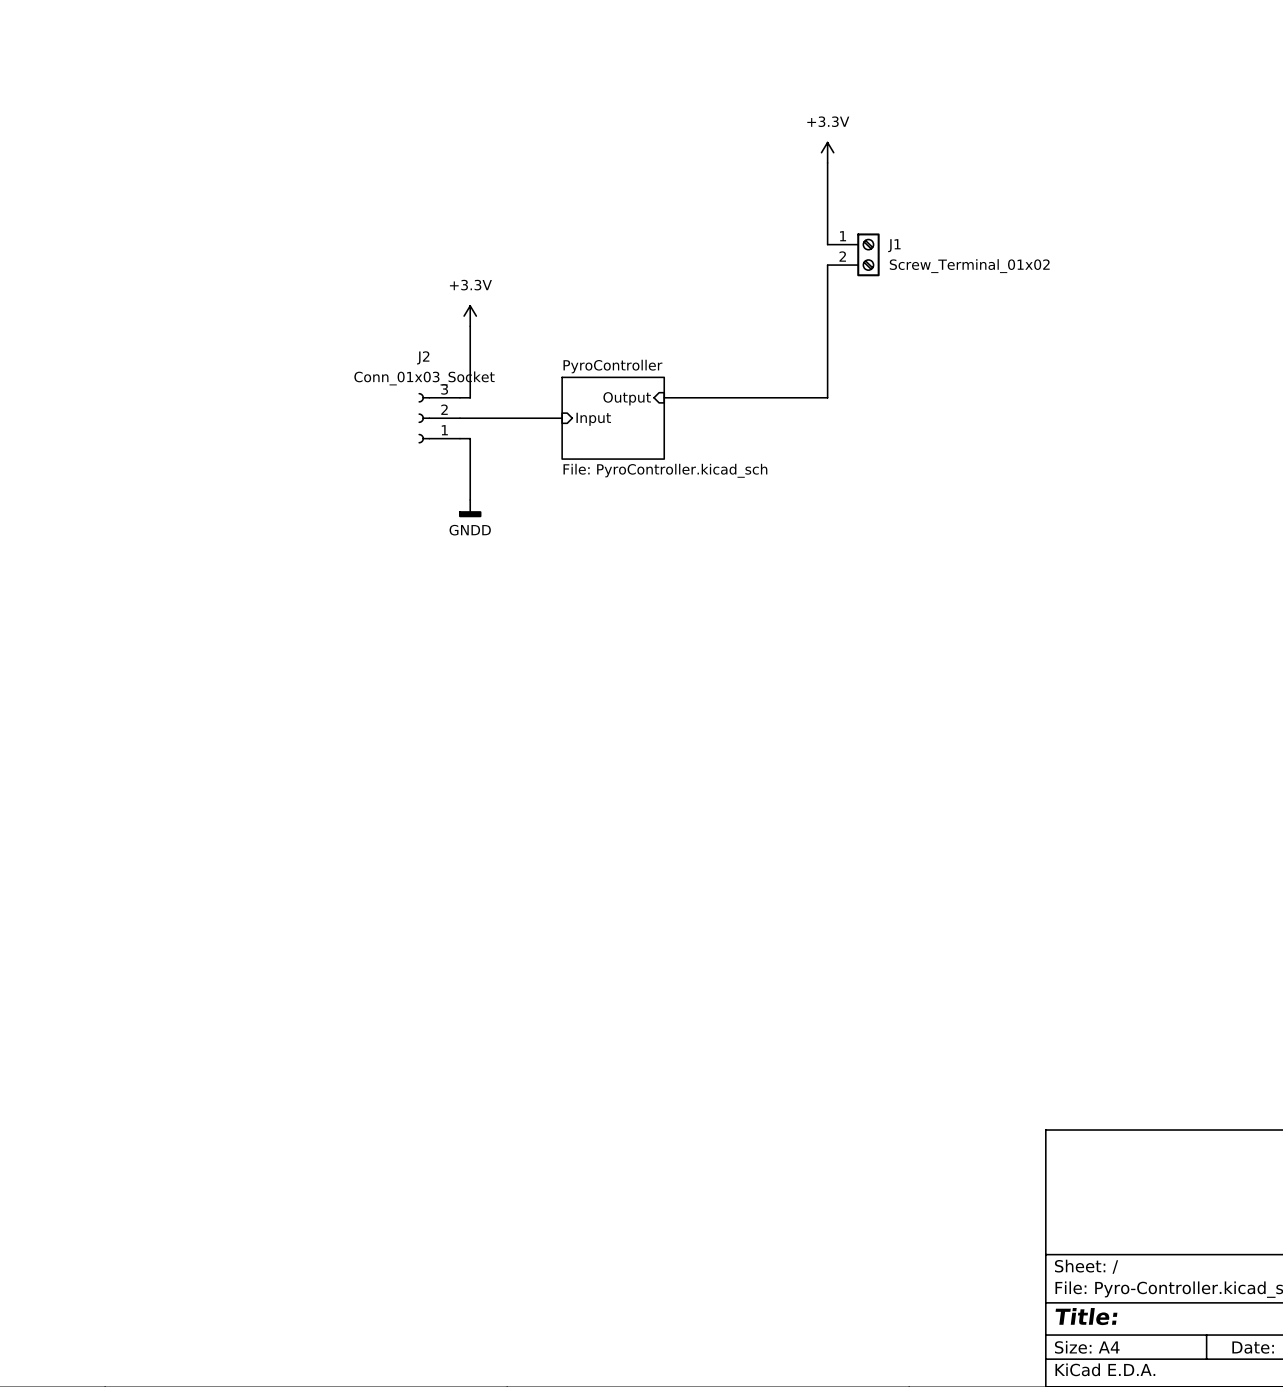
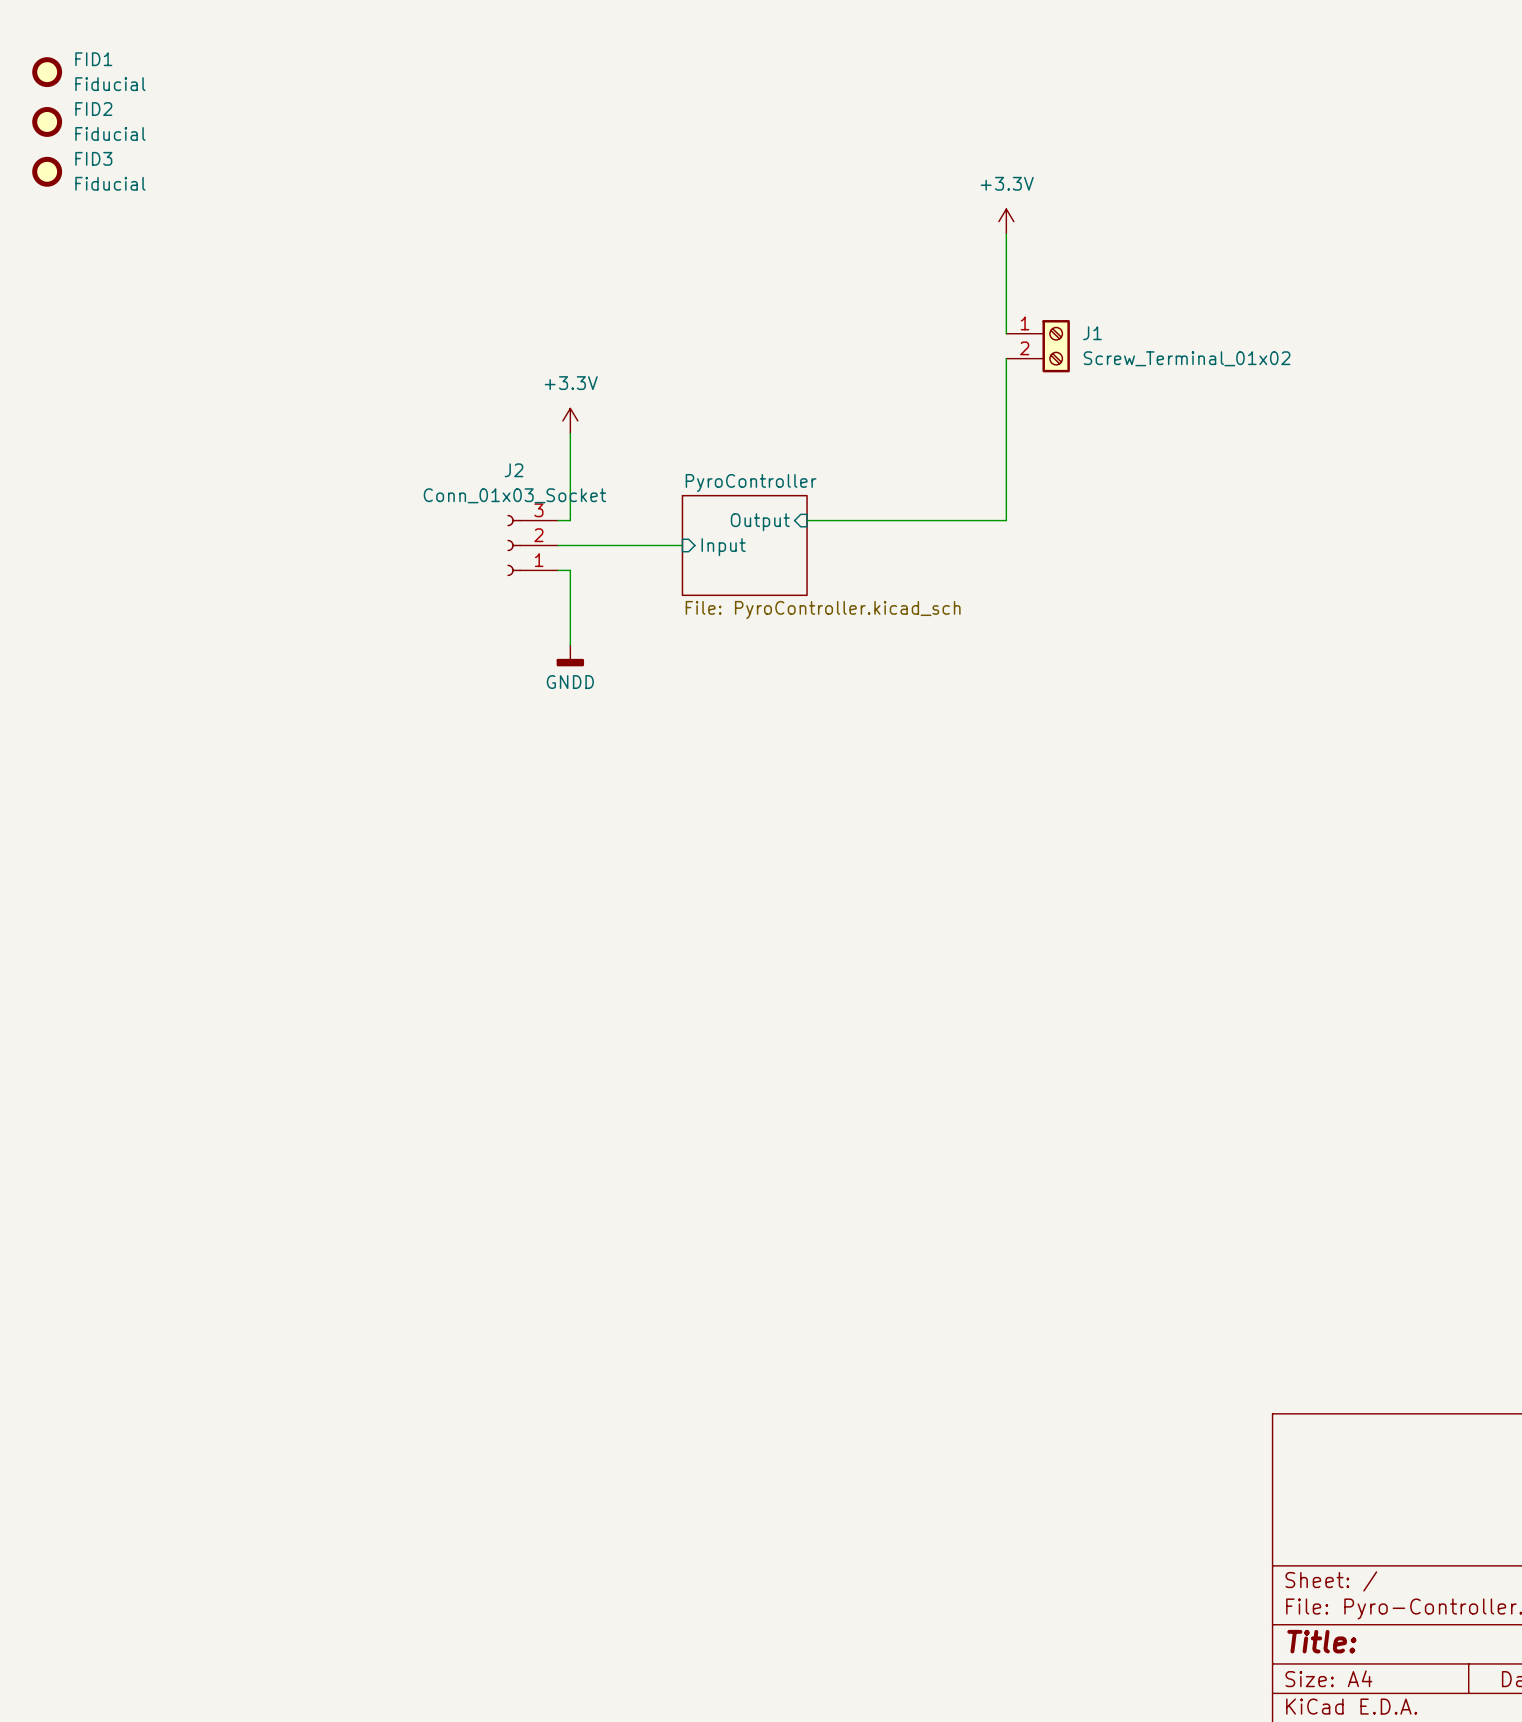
FID1: none -> Fiducial (47, 72)
FID2: none -> Fiducial (47, 121)
FID3: none -> Fiducial (47, 171)

